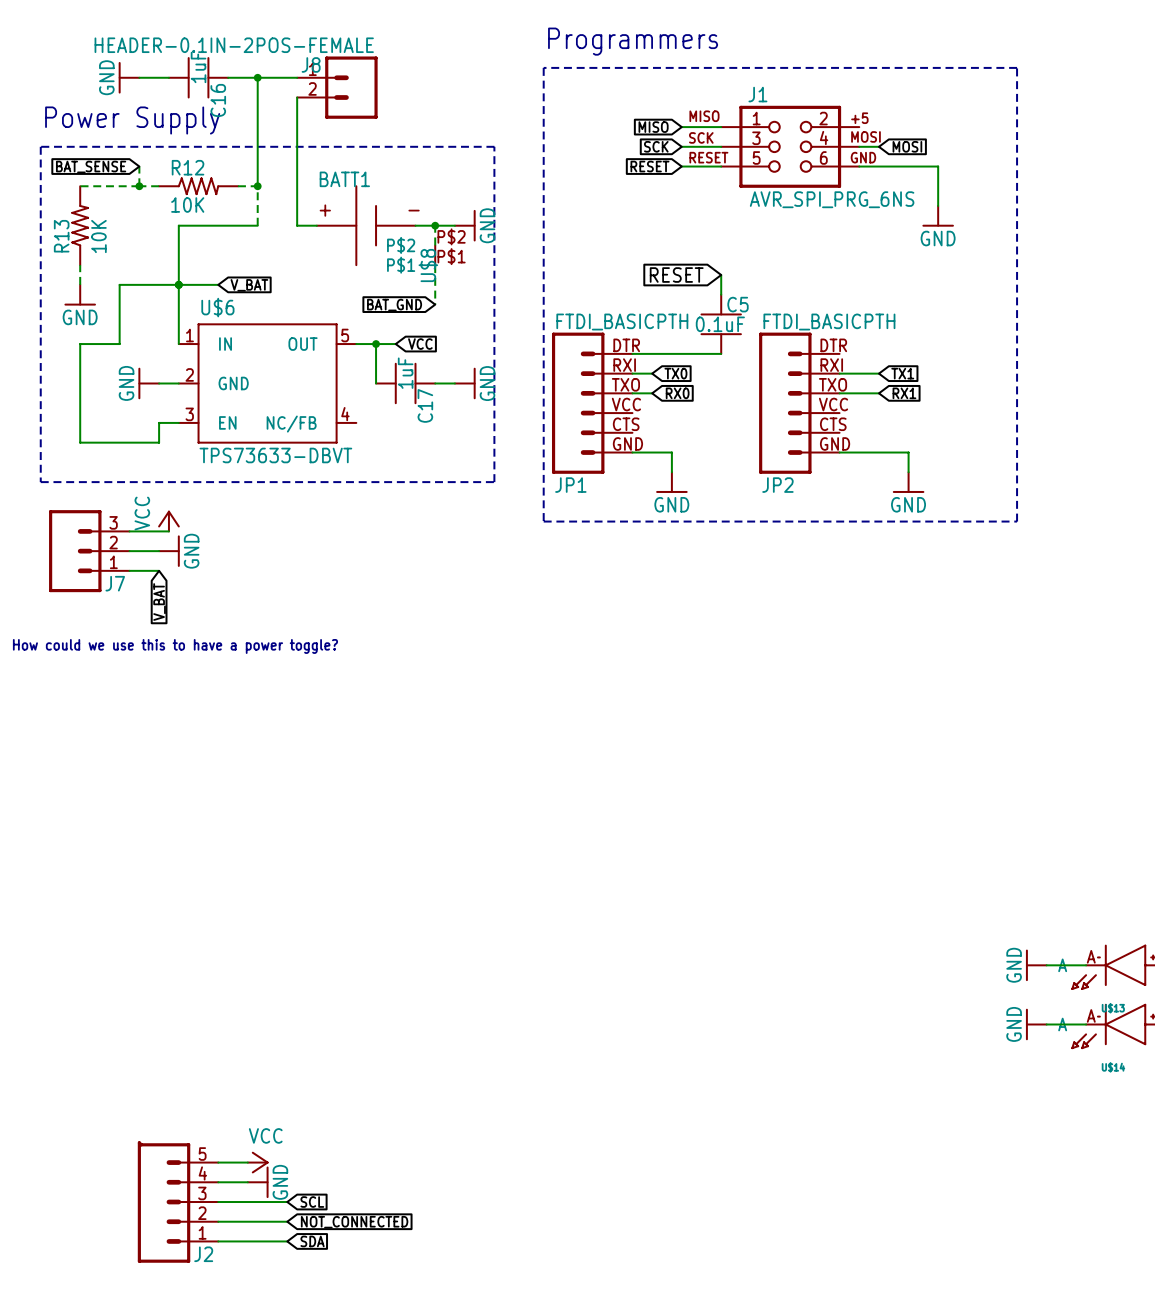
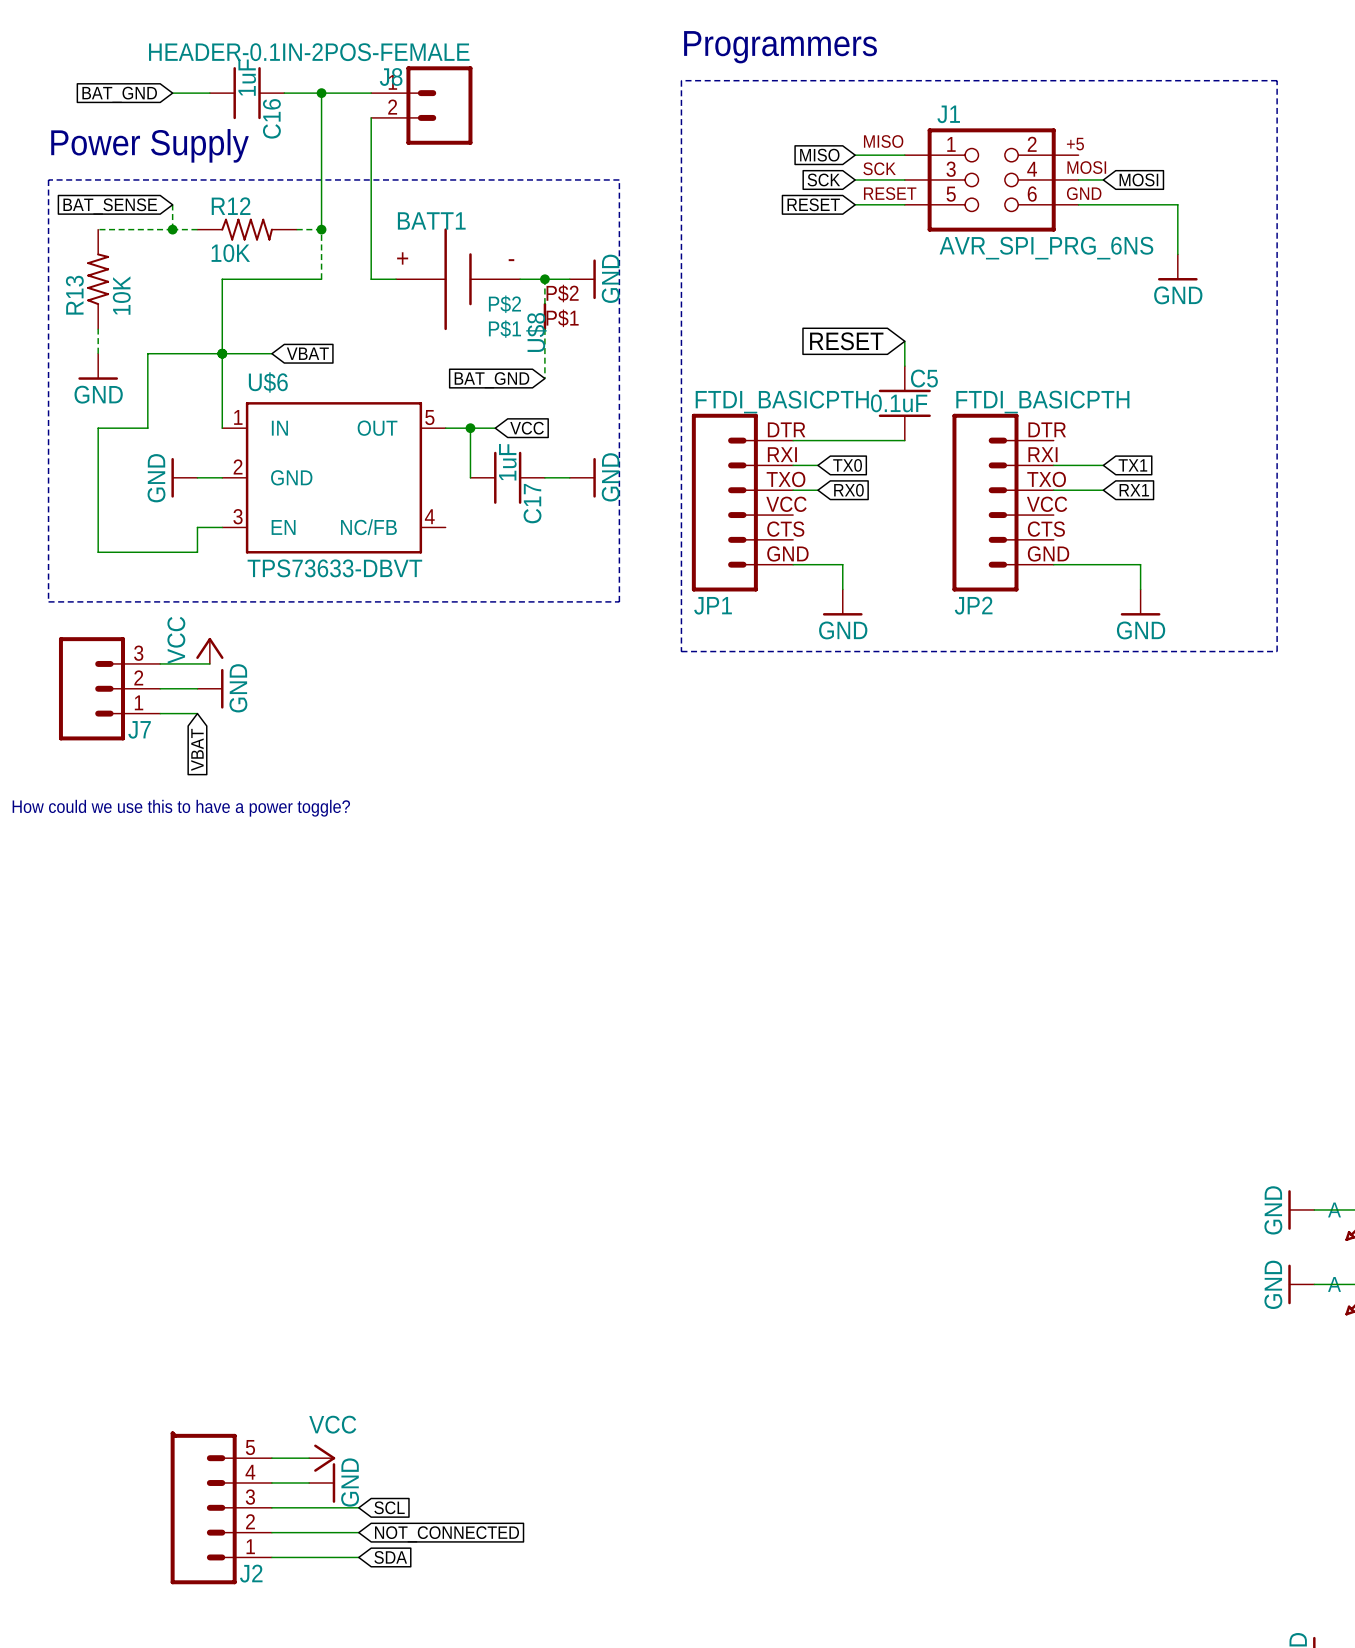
power symbol: GND (129, 77) -> none
global label: none -> BAT_GND (119, 94)
global label: V_BAT (249, 285) -> VBAT (307, 353)
global label: V_BAT (159, 602) -> VBAT (197, 749)

